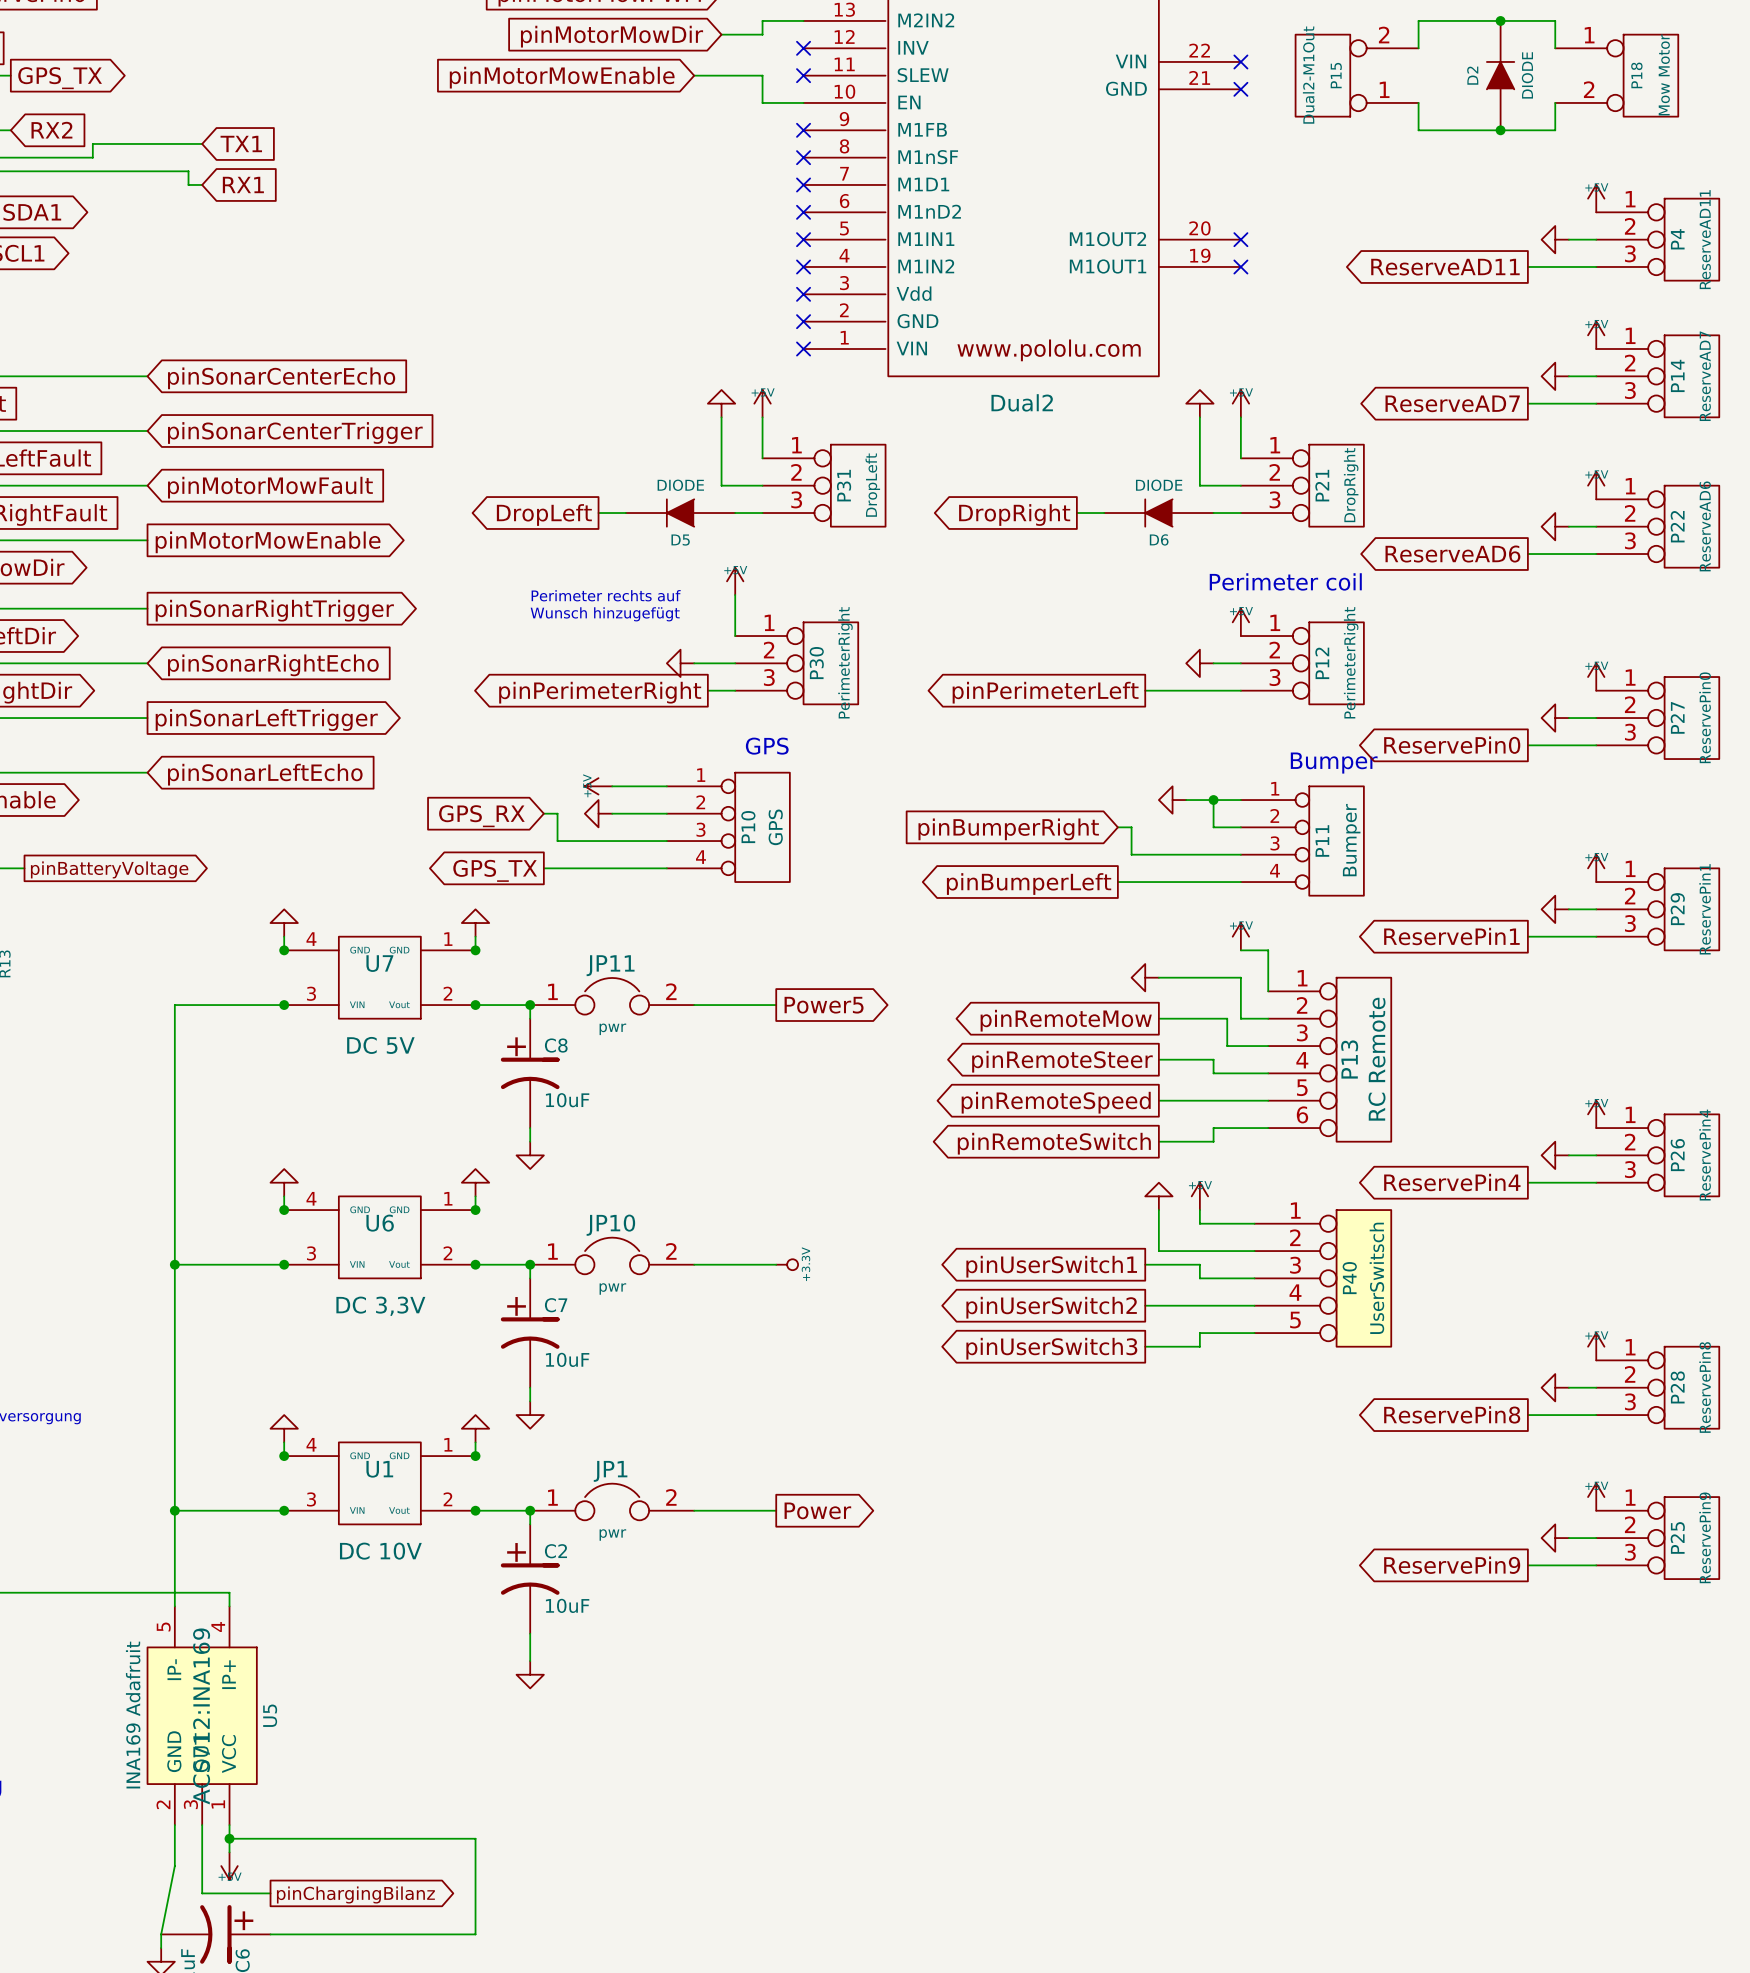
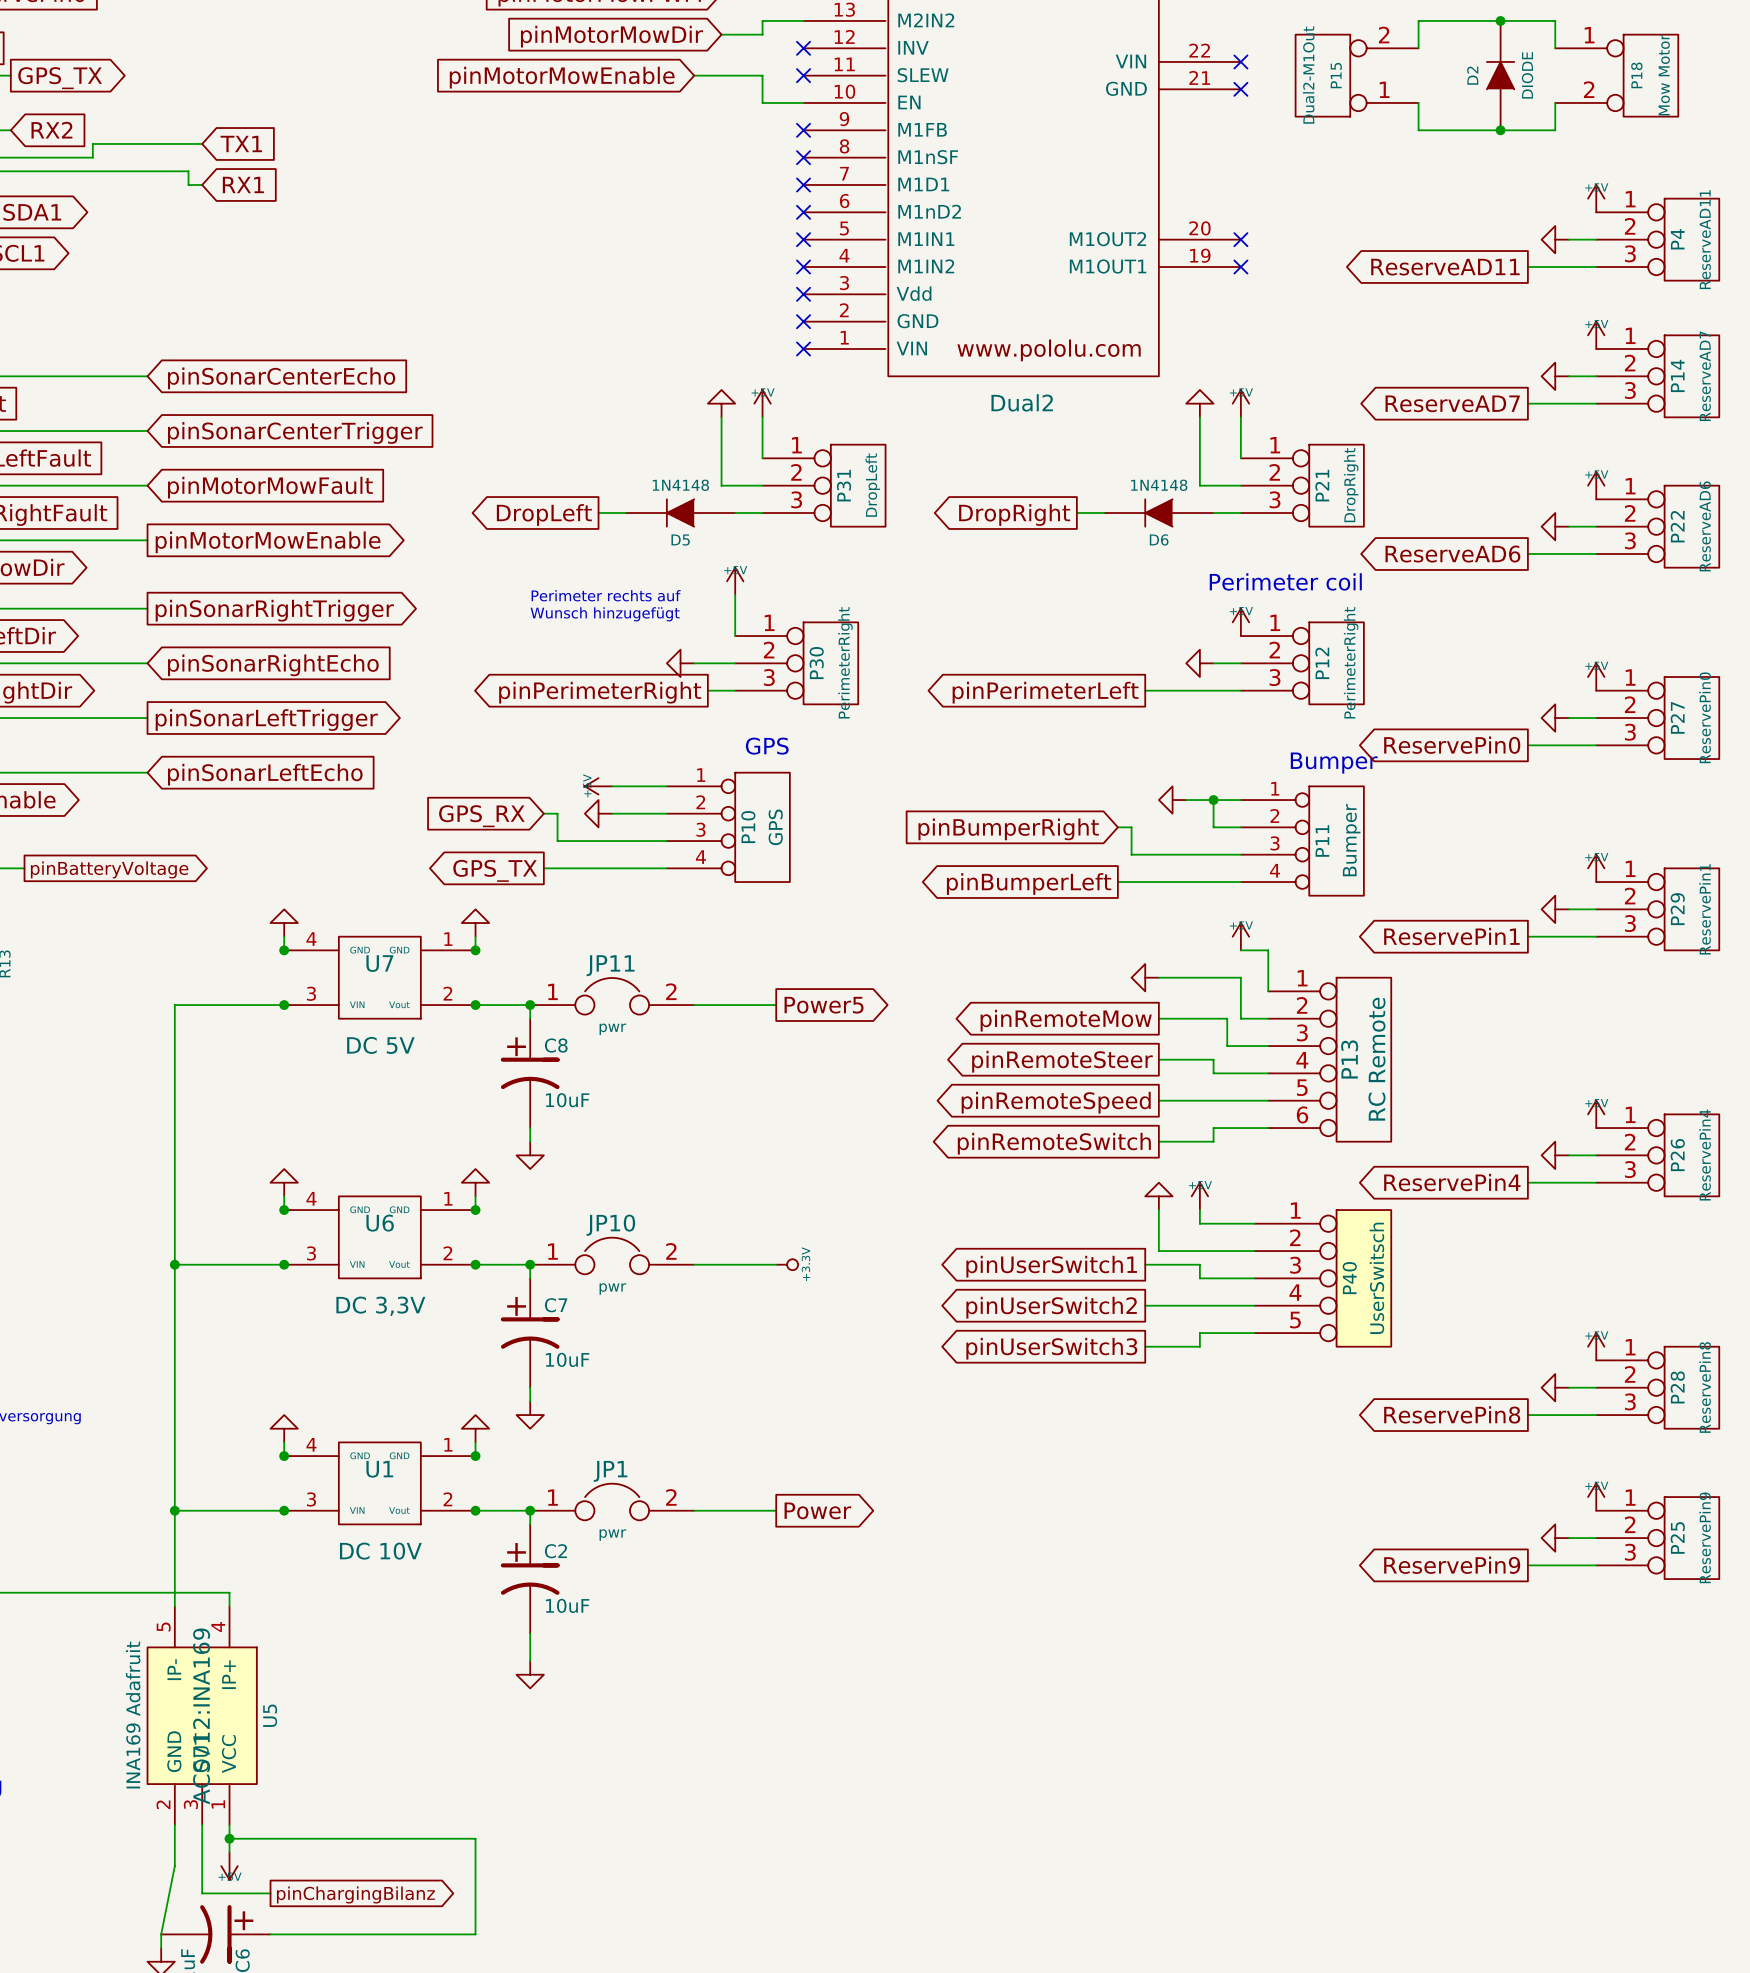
D5 value: DIODE (680, 485) -> 1N4148 (680, 485)
D6 value: DIODE (1159, 485) -> 1N4148 (1159, 485)

